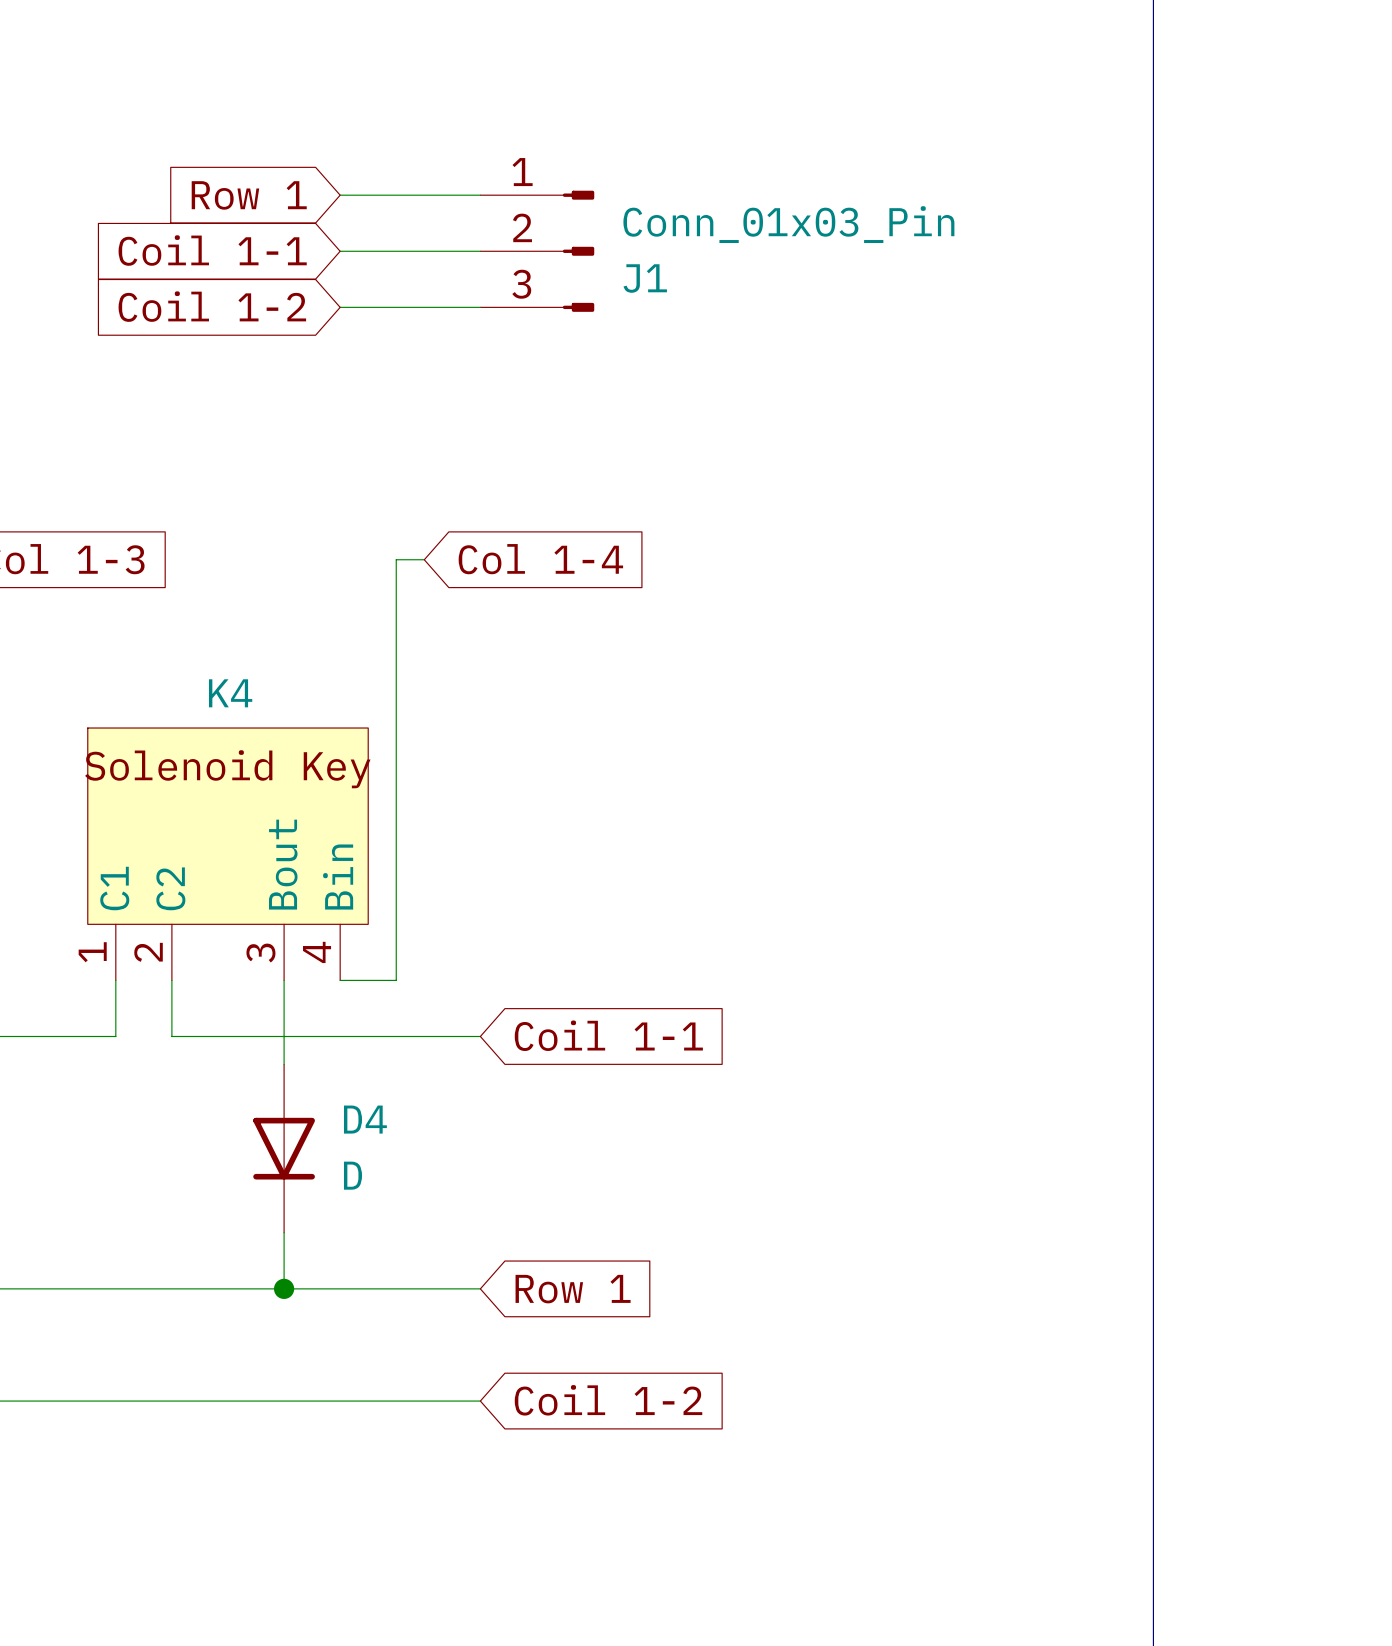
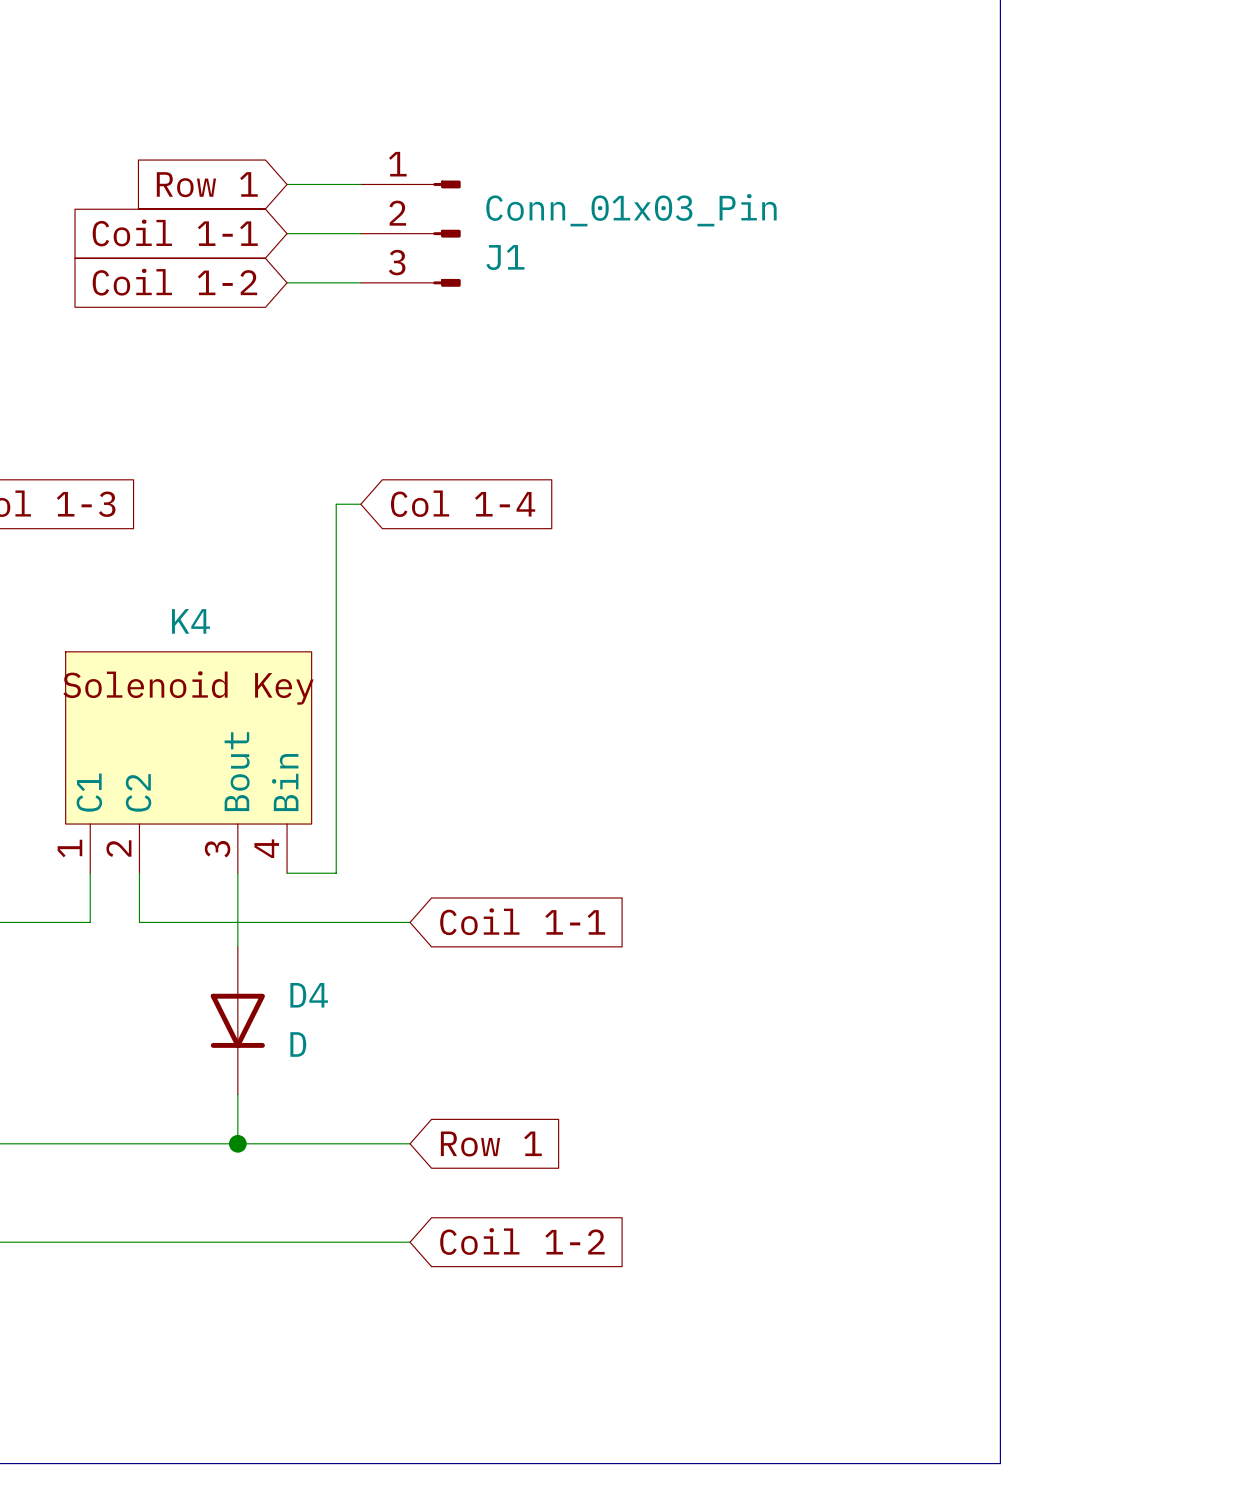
J1 position: (537, 251) -> (410, 233)

